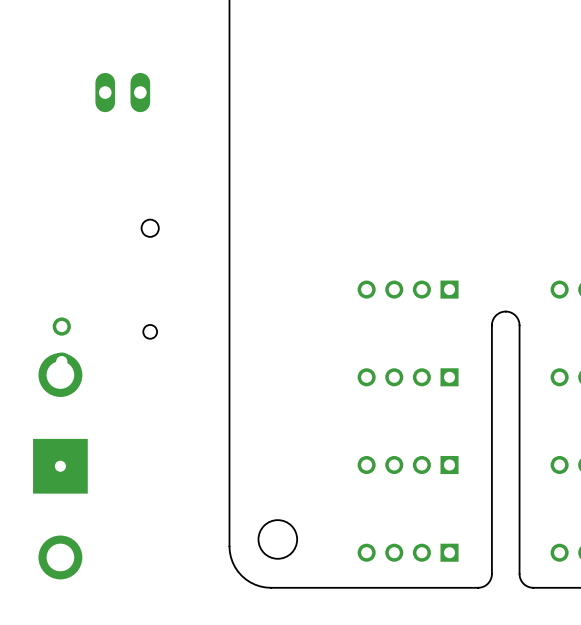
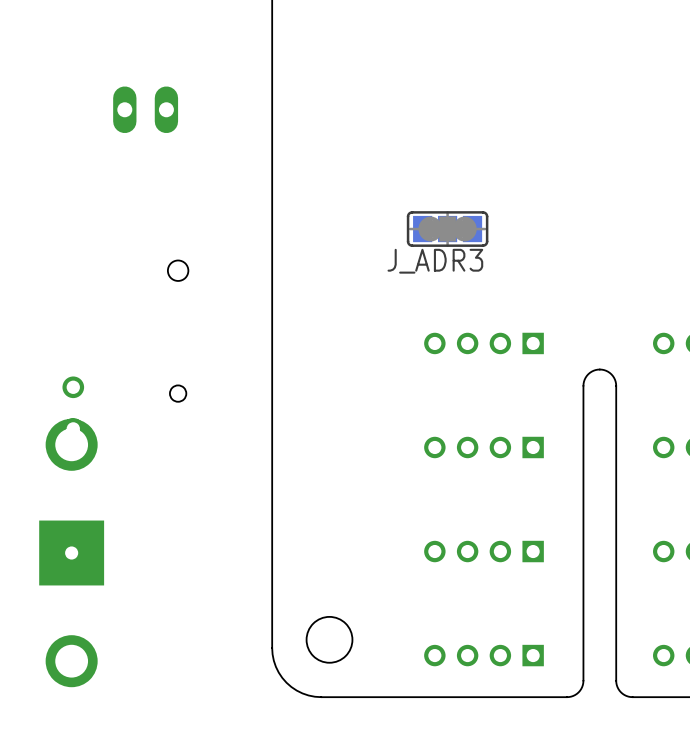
J_ADR3: none -> (447, 229)

